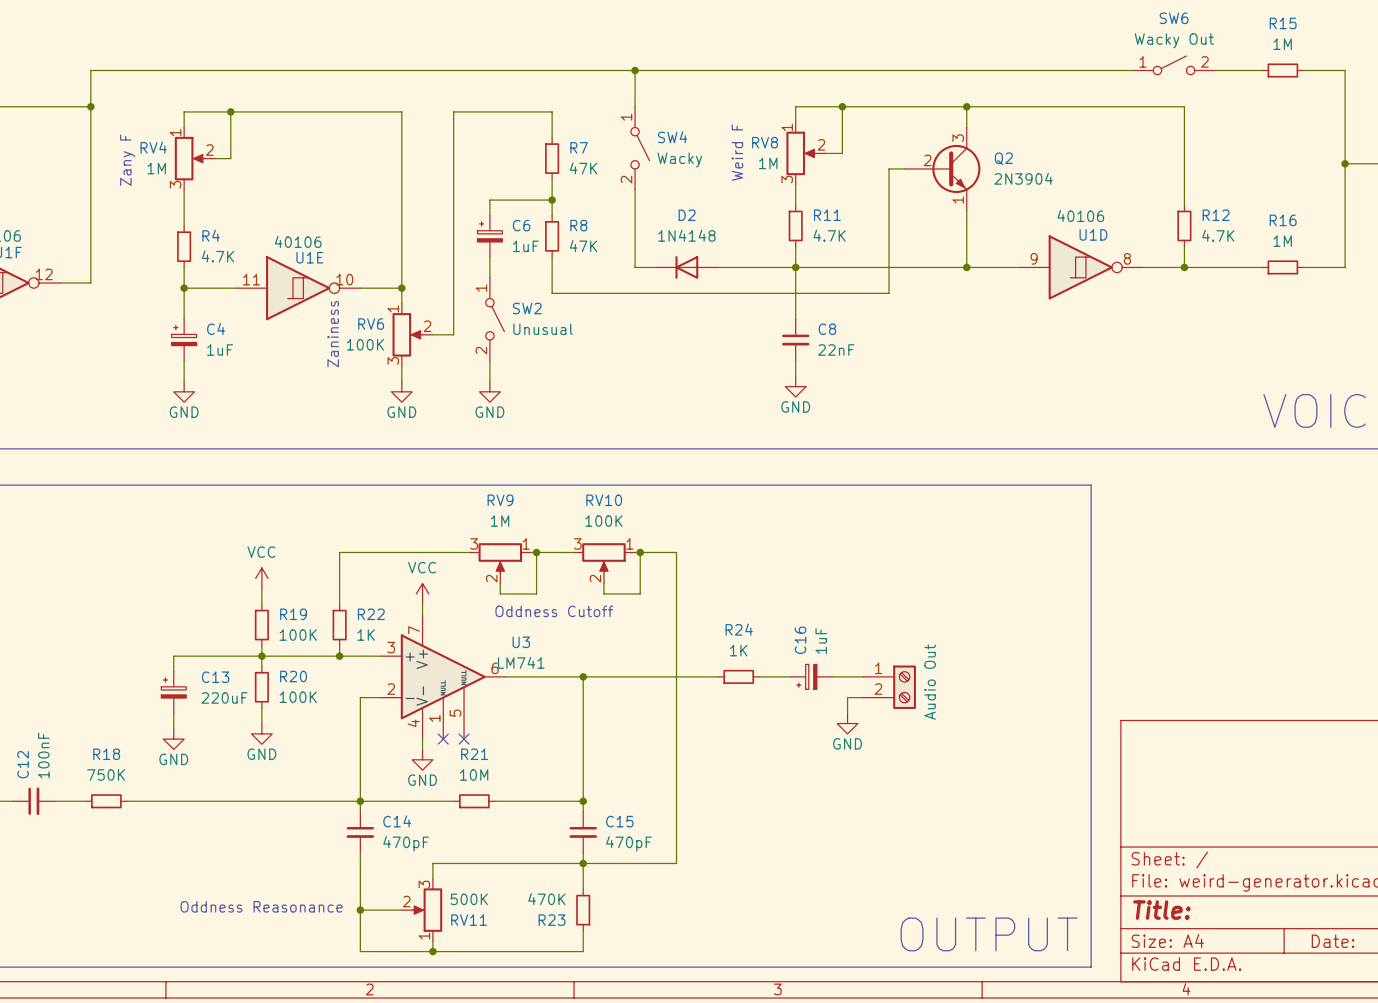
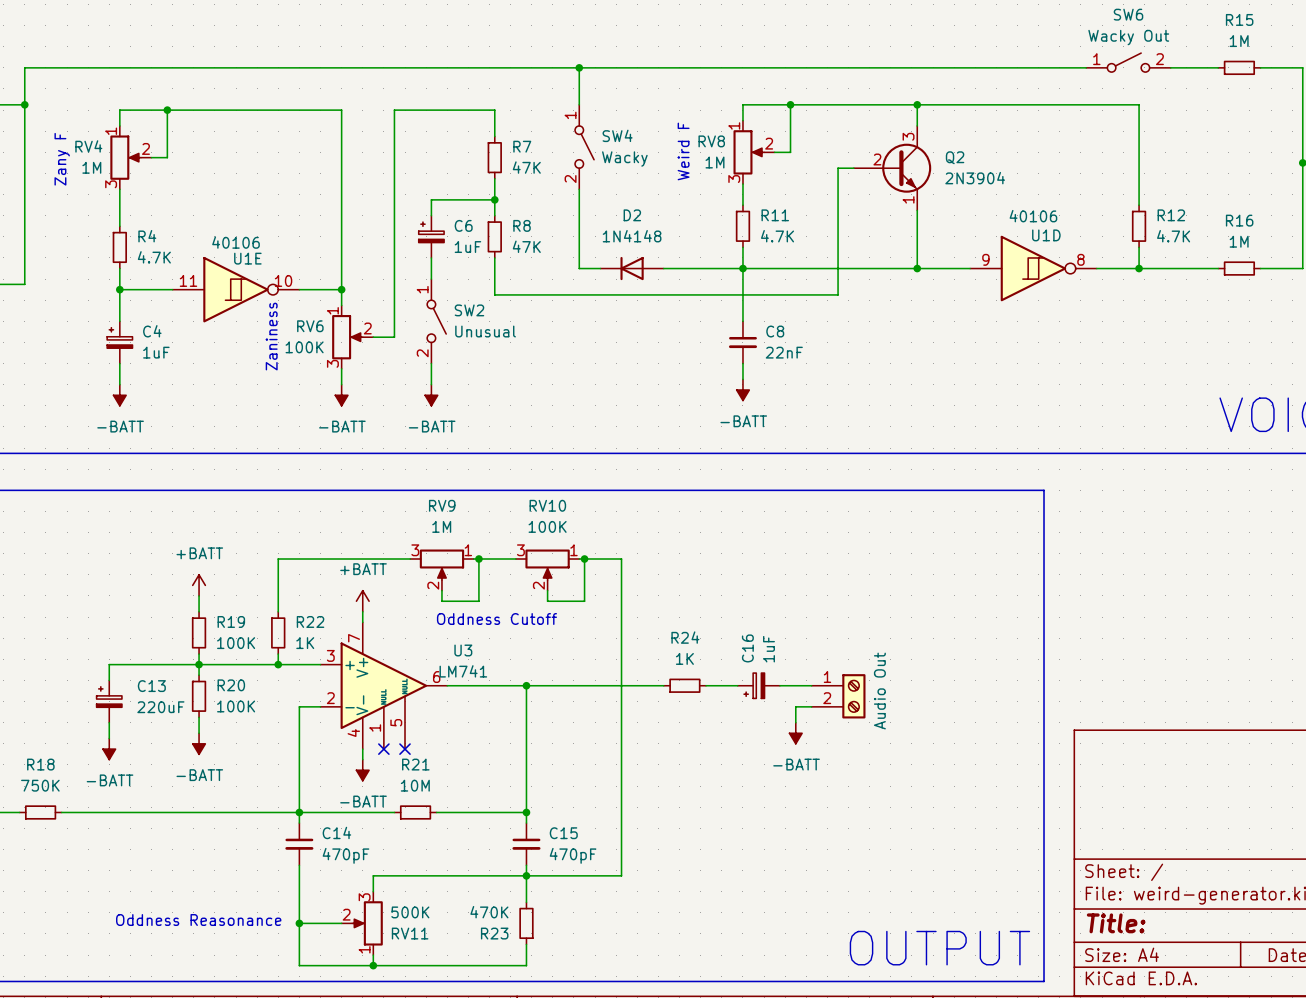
power symbol: GND (795, 386) -> -BATT (742, 390)
power symbol: GND (184, 391) -> -BATT (119, 395)
power symbol: GND (401, 391) -> -BATT (341, 395)
power symbol: GND (489, 391) -> -BATT (431, 395)
power symbol: VCC (261, 578) -> +BATT (199, 585)
power symbol: VCC (422, 593) -> +BATT (362, 601)
power symbol: GND (847, 723) -> -BATT (795, 733)
power symbol: GND (261, 733) -> -BATT (199, 743)
power symbol: GND (173, 739) -> -BATT (109, 749)
power symbol: GND (422, 759) -> -BATT (362, 770)

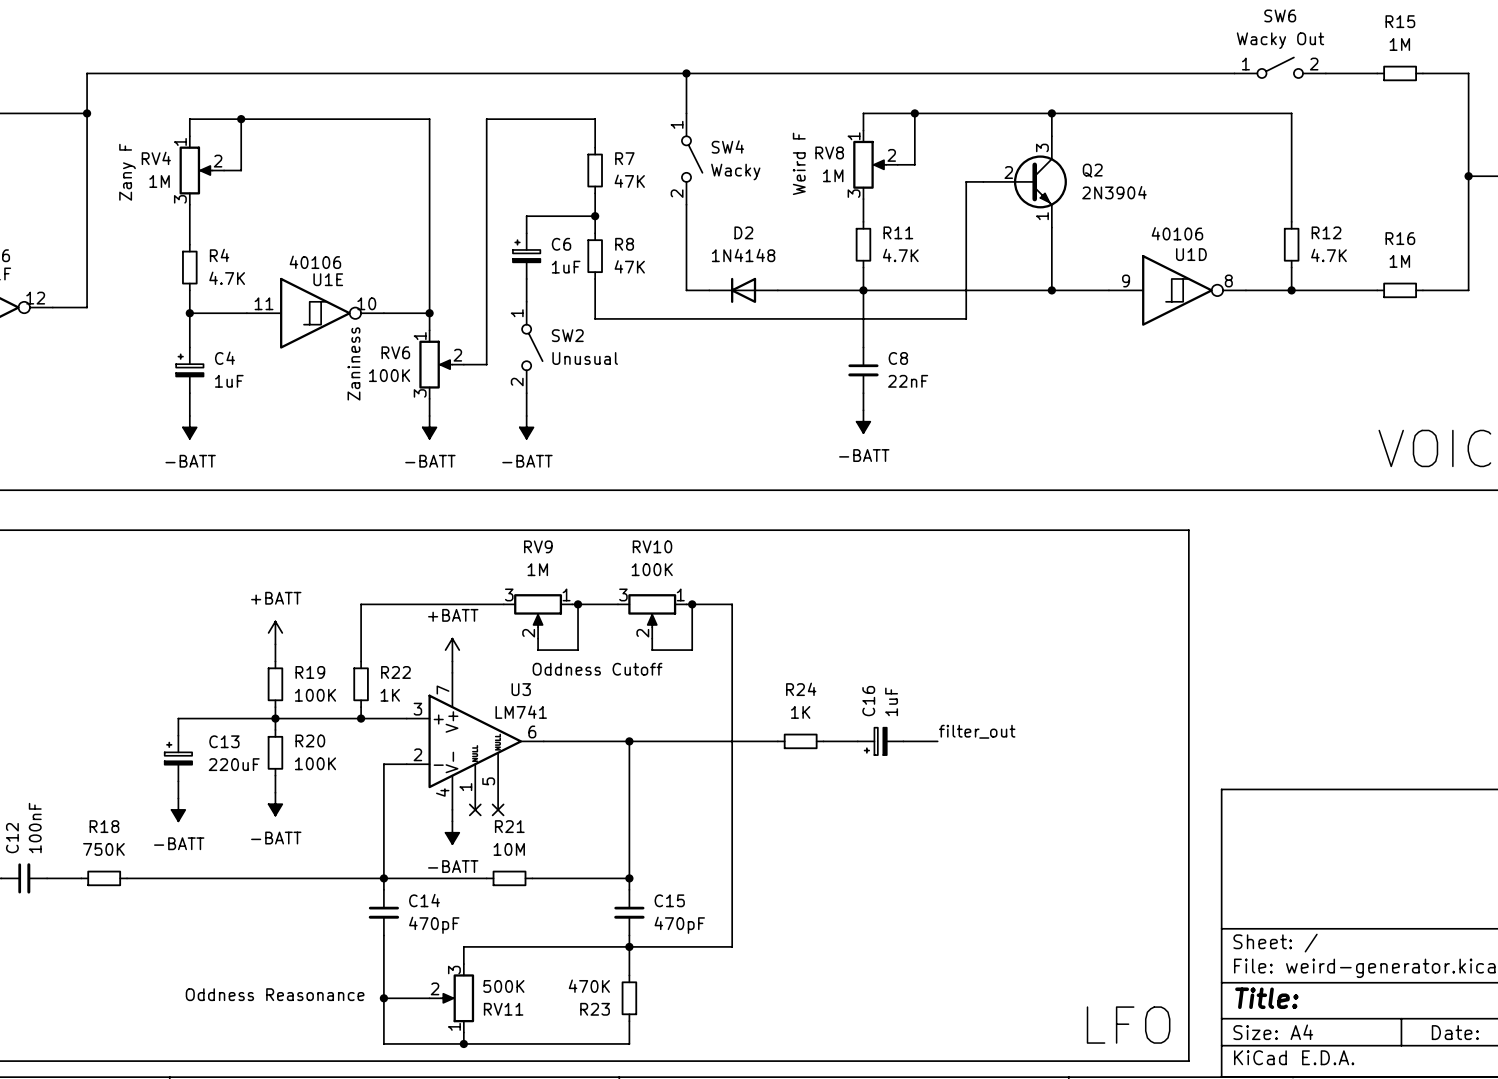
U3 name position: U3 (463, 650) -> U3 (521, 689)
U3 value position: LM741 (463, 671) -> LM741 (521, 712)
label: none -> filter_out (977, 731)
part: Audio Out (838, 696) -> none
wire: (811, 706) (795, 706) (795, 722) -> none
power symbol: -BATT (795, 733) -> none
text: OUTPUT (939, 948) -> LFO (1128, 1025)

